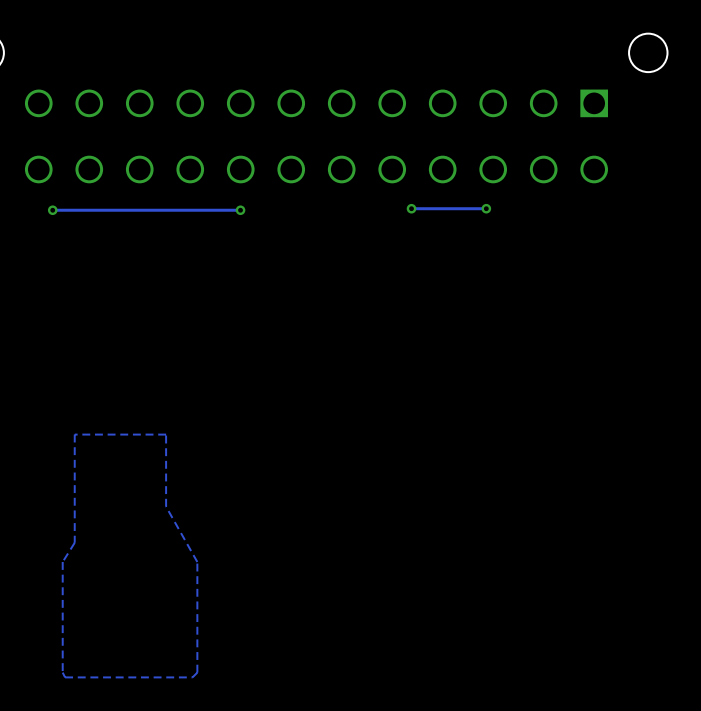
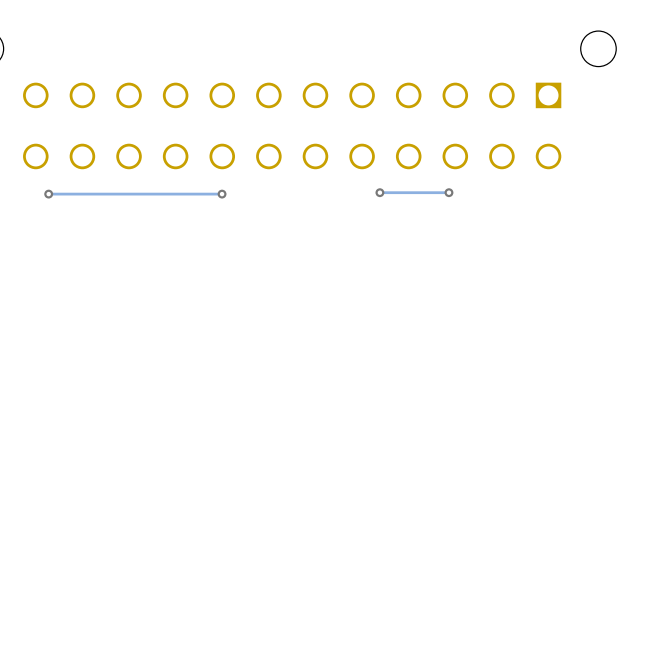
zone outline: (166, 434) (74, 434) (74, 542) (62, 562) (62, 672) (65, 677) (192, 677) (197, 672) (197, 562) (166, 506) (166, 434) -> none

